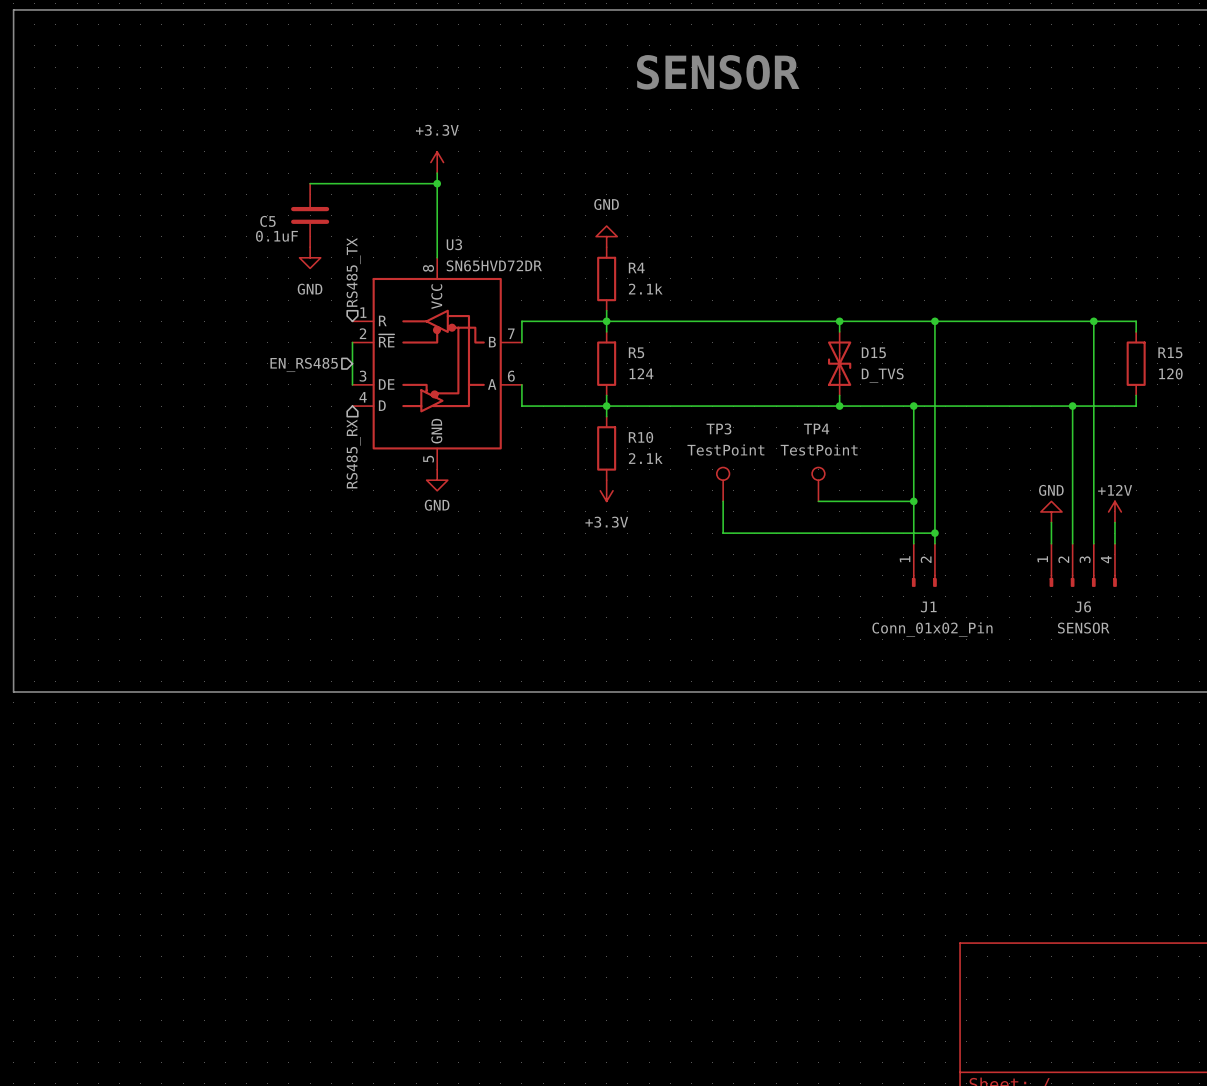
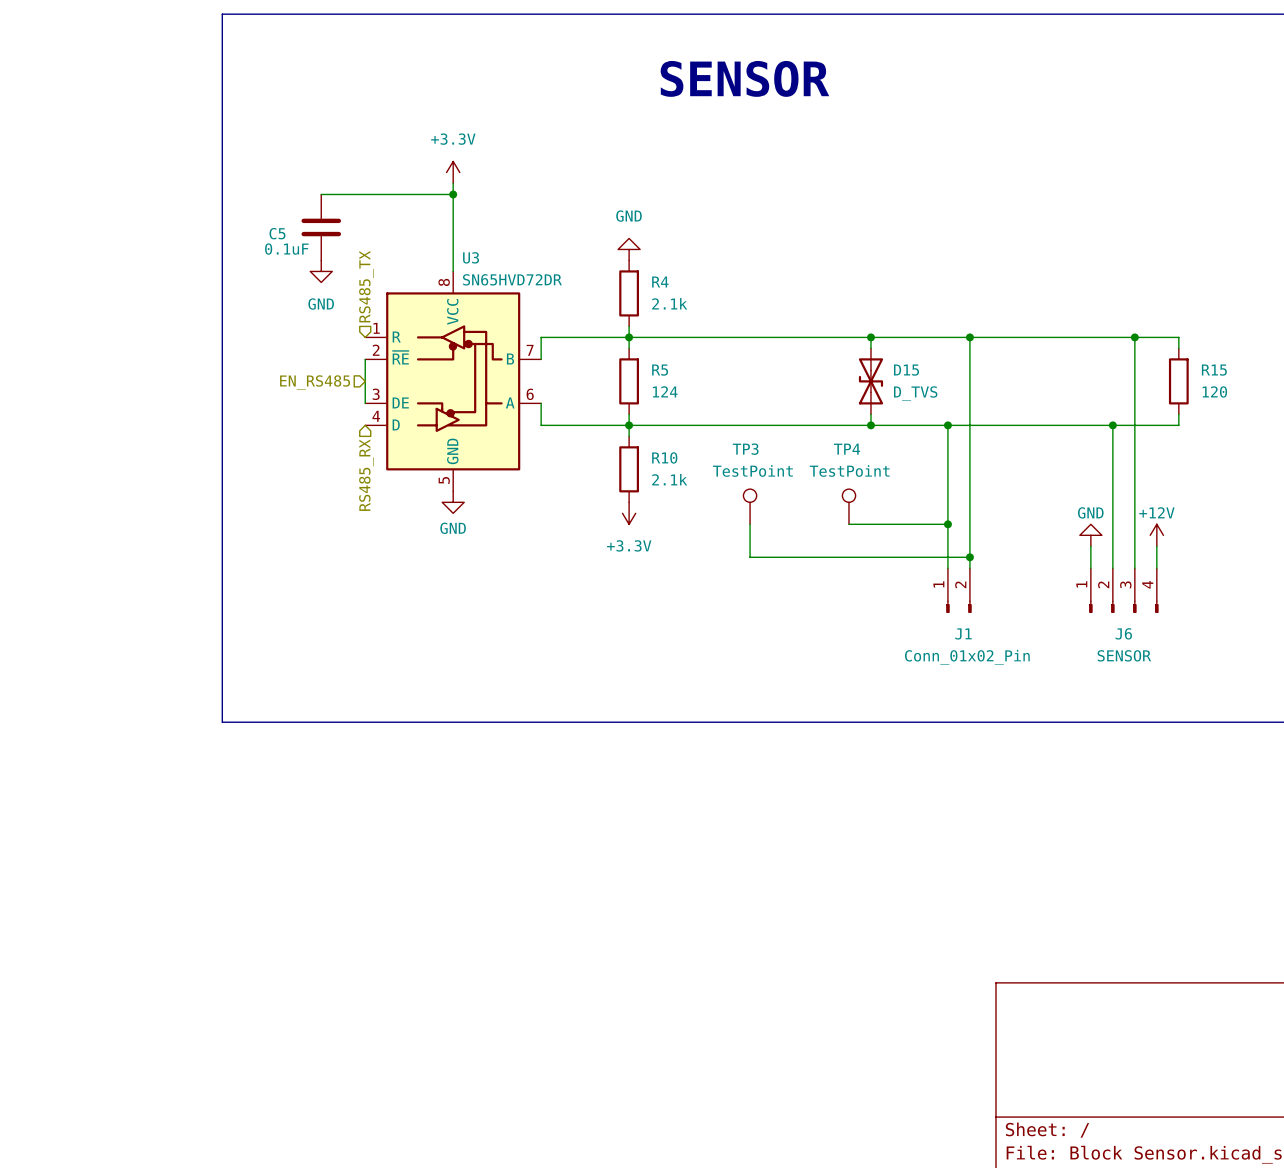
line: (214, 9) (13, 9) (13, 692) (214, 692) -> (222, 14) (222, 722)

